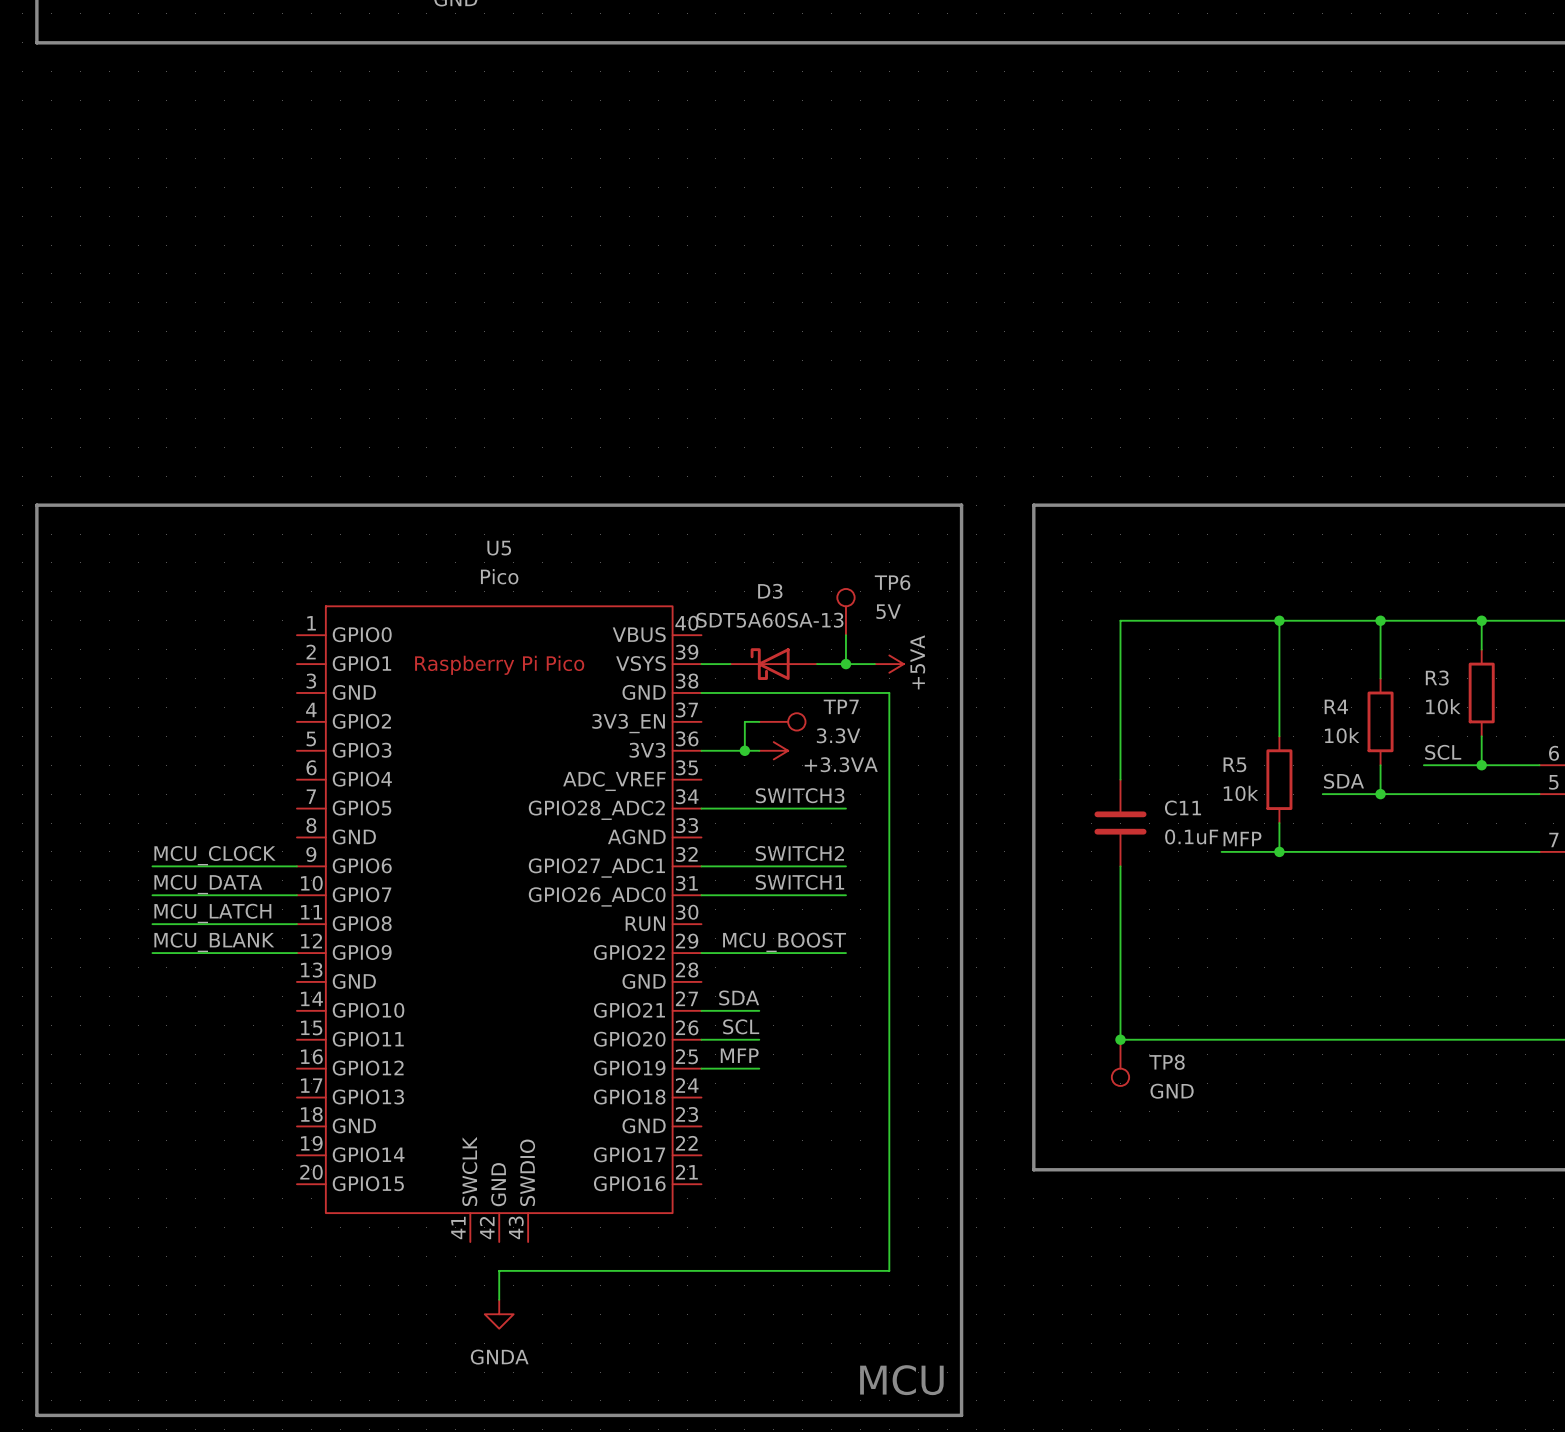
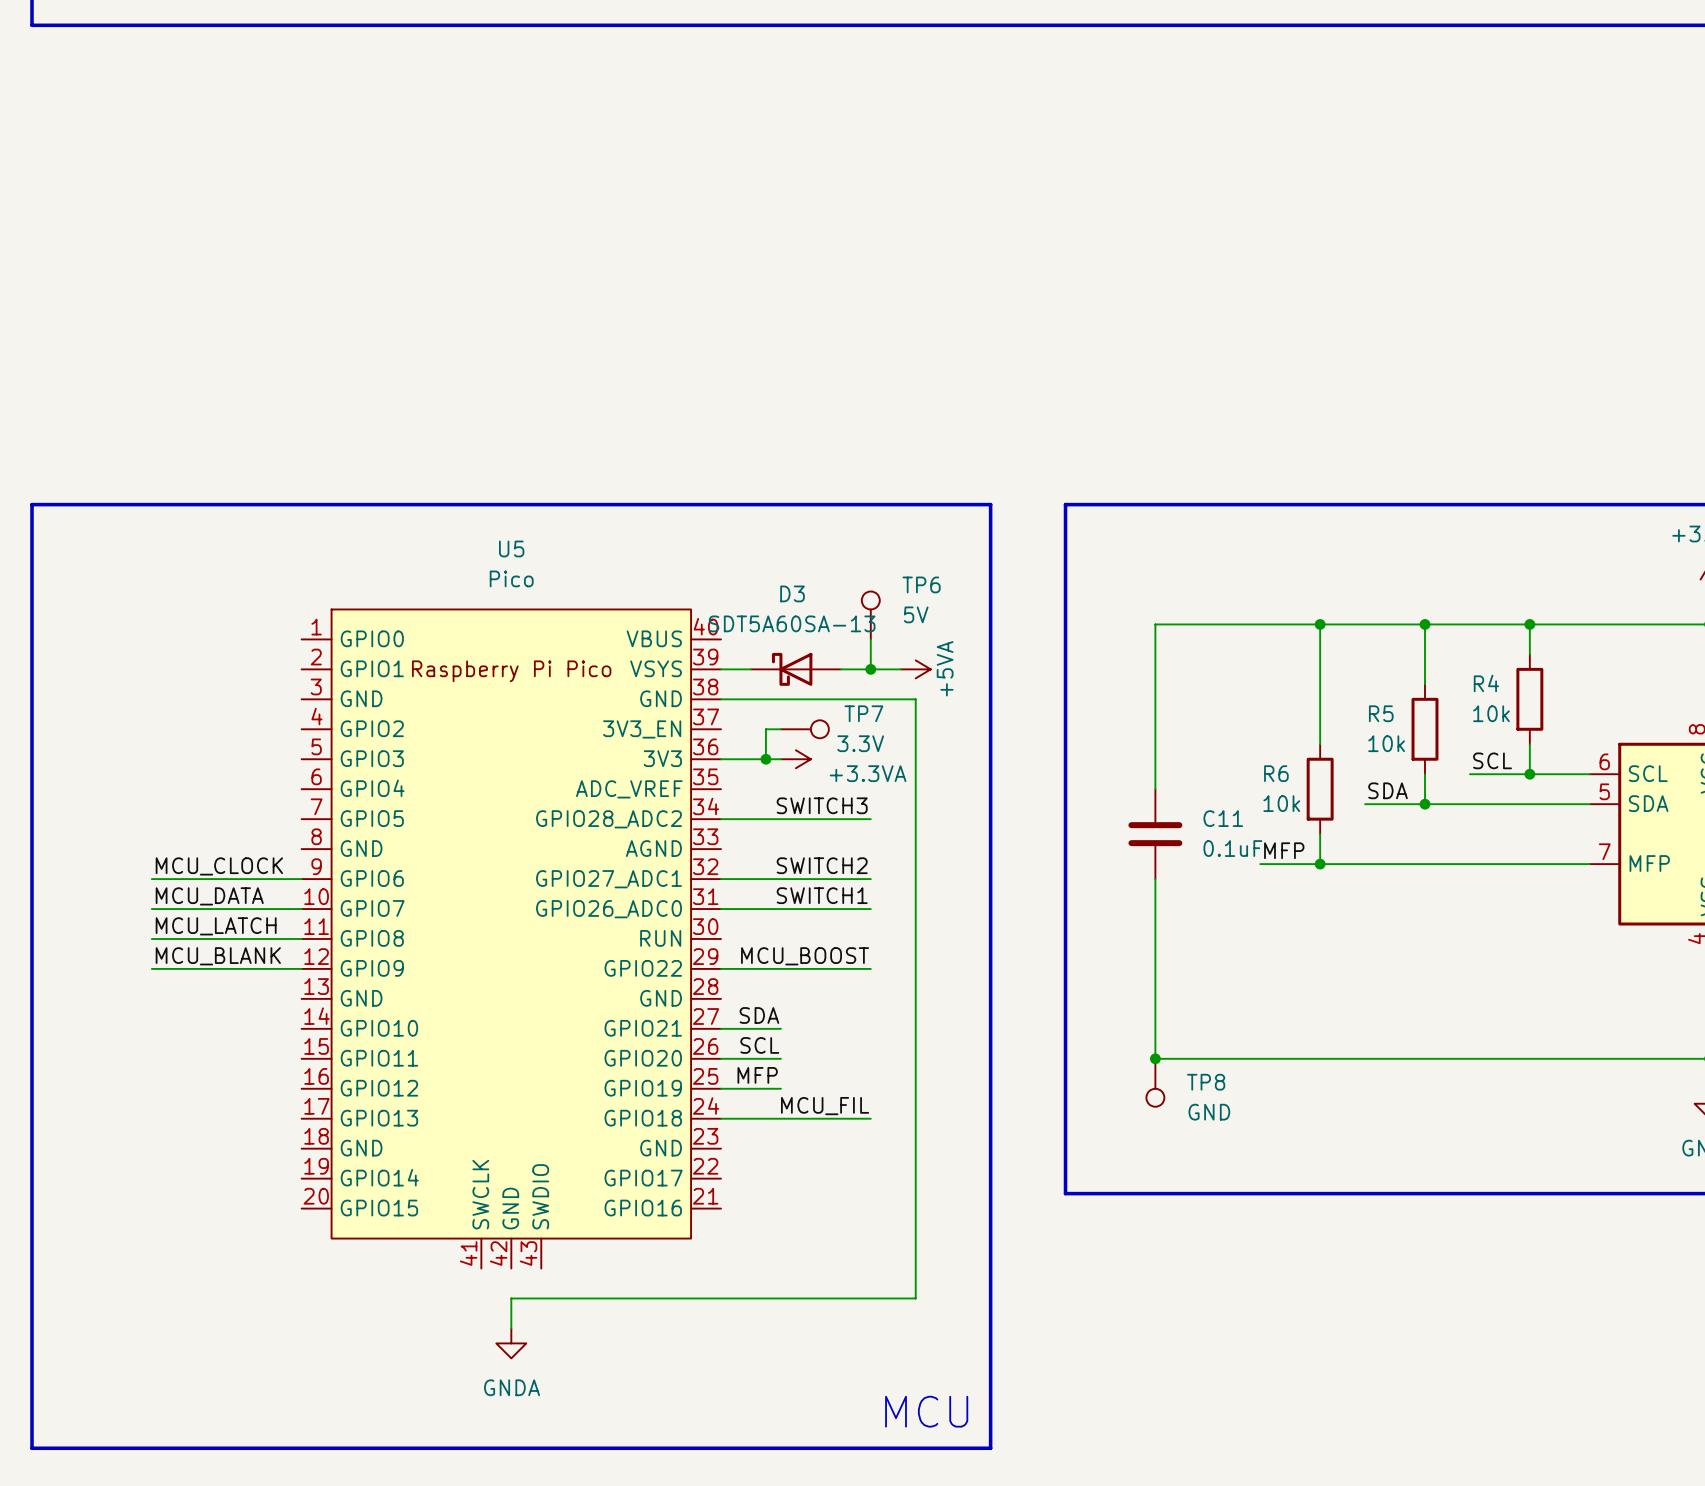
R3 name: R3 (1437, 678) -> R4 (1486, 683)
R4 name: R4 (1336, 706) -> R5 (1381, 713)
R5 name: R5 (1234, 764) -> R6 (1276, 773)
label: none -> MCU_FIL (825, 1106)
wire: none -> (721, 1118) (870, 1118)

